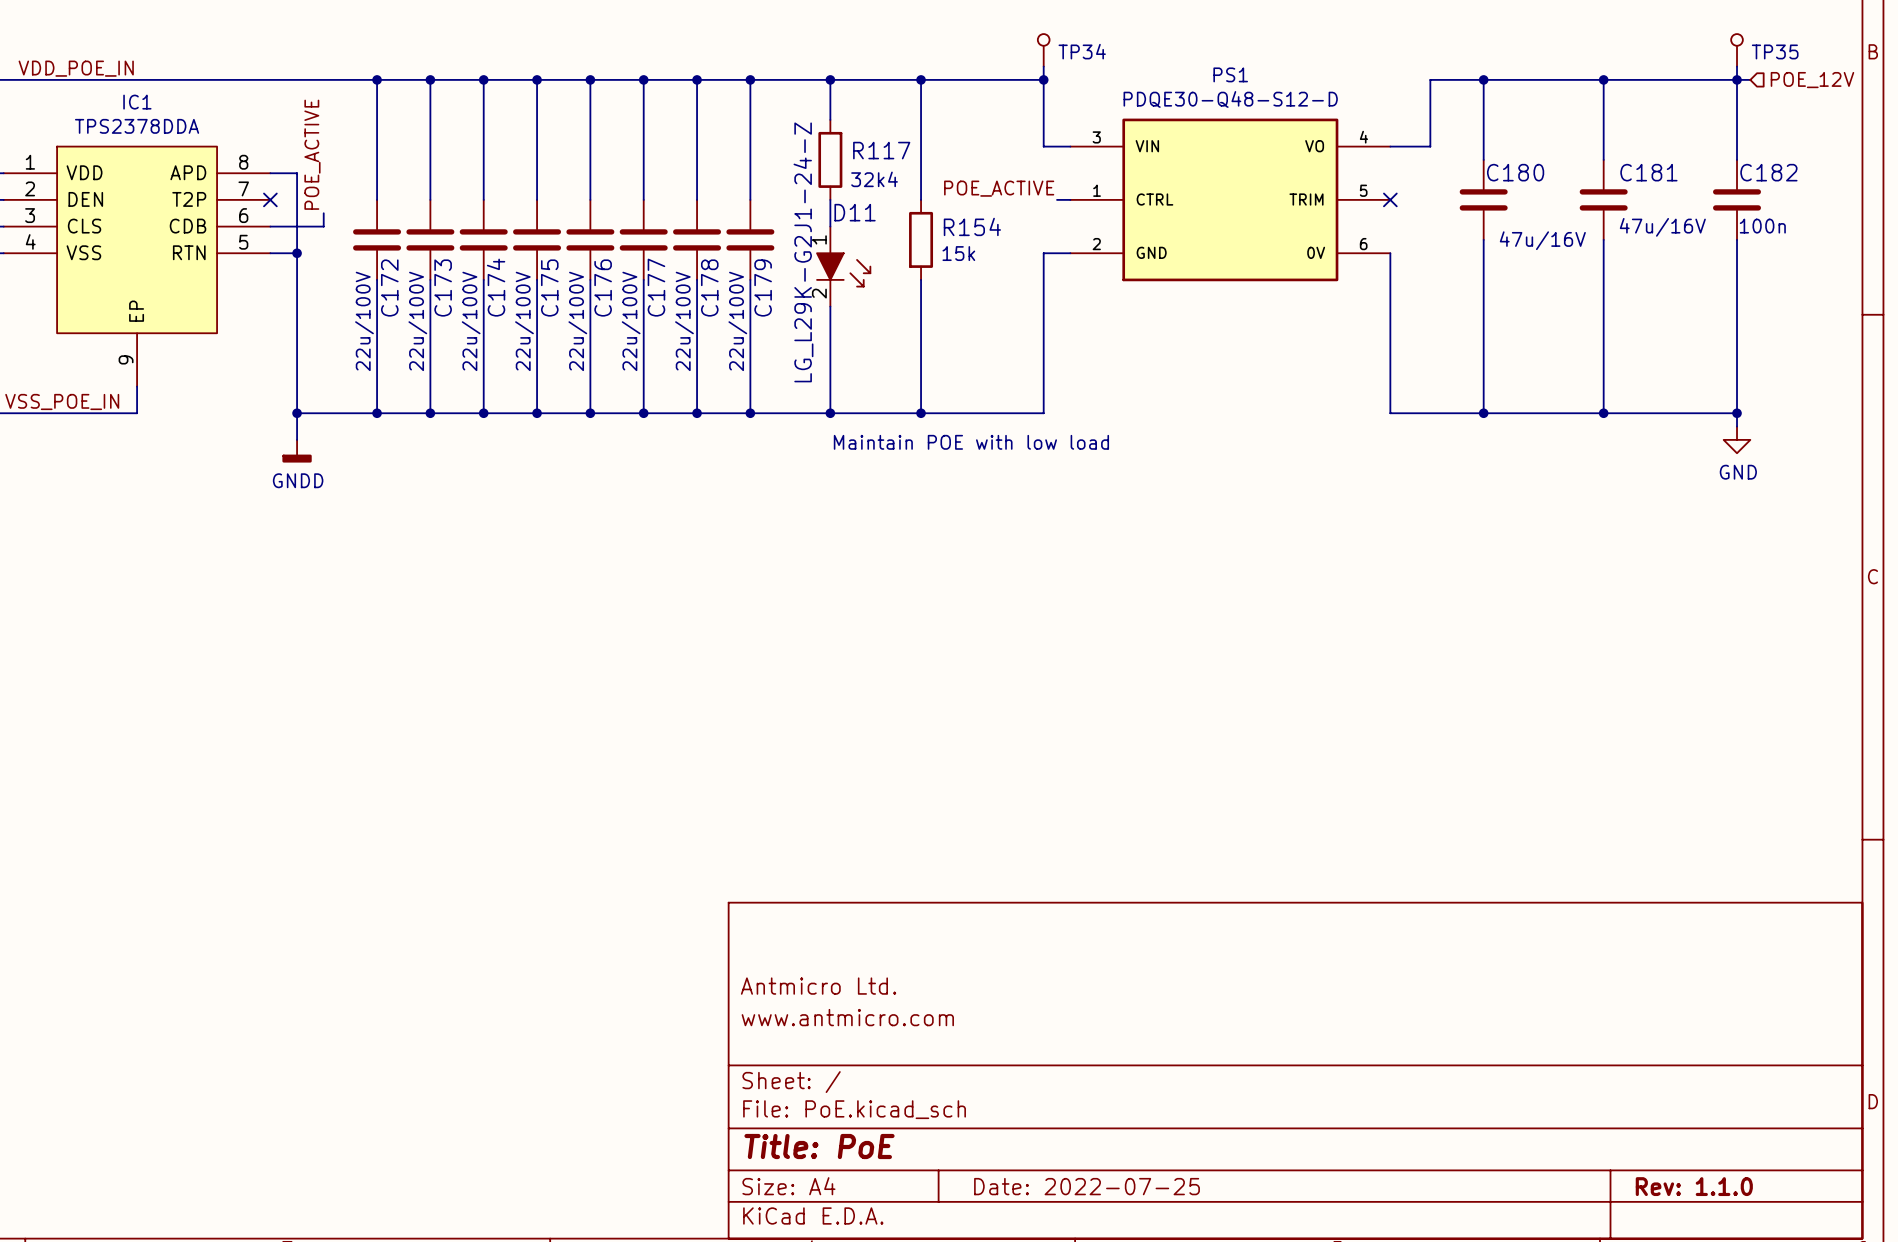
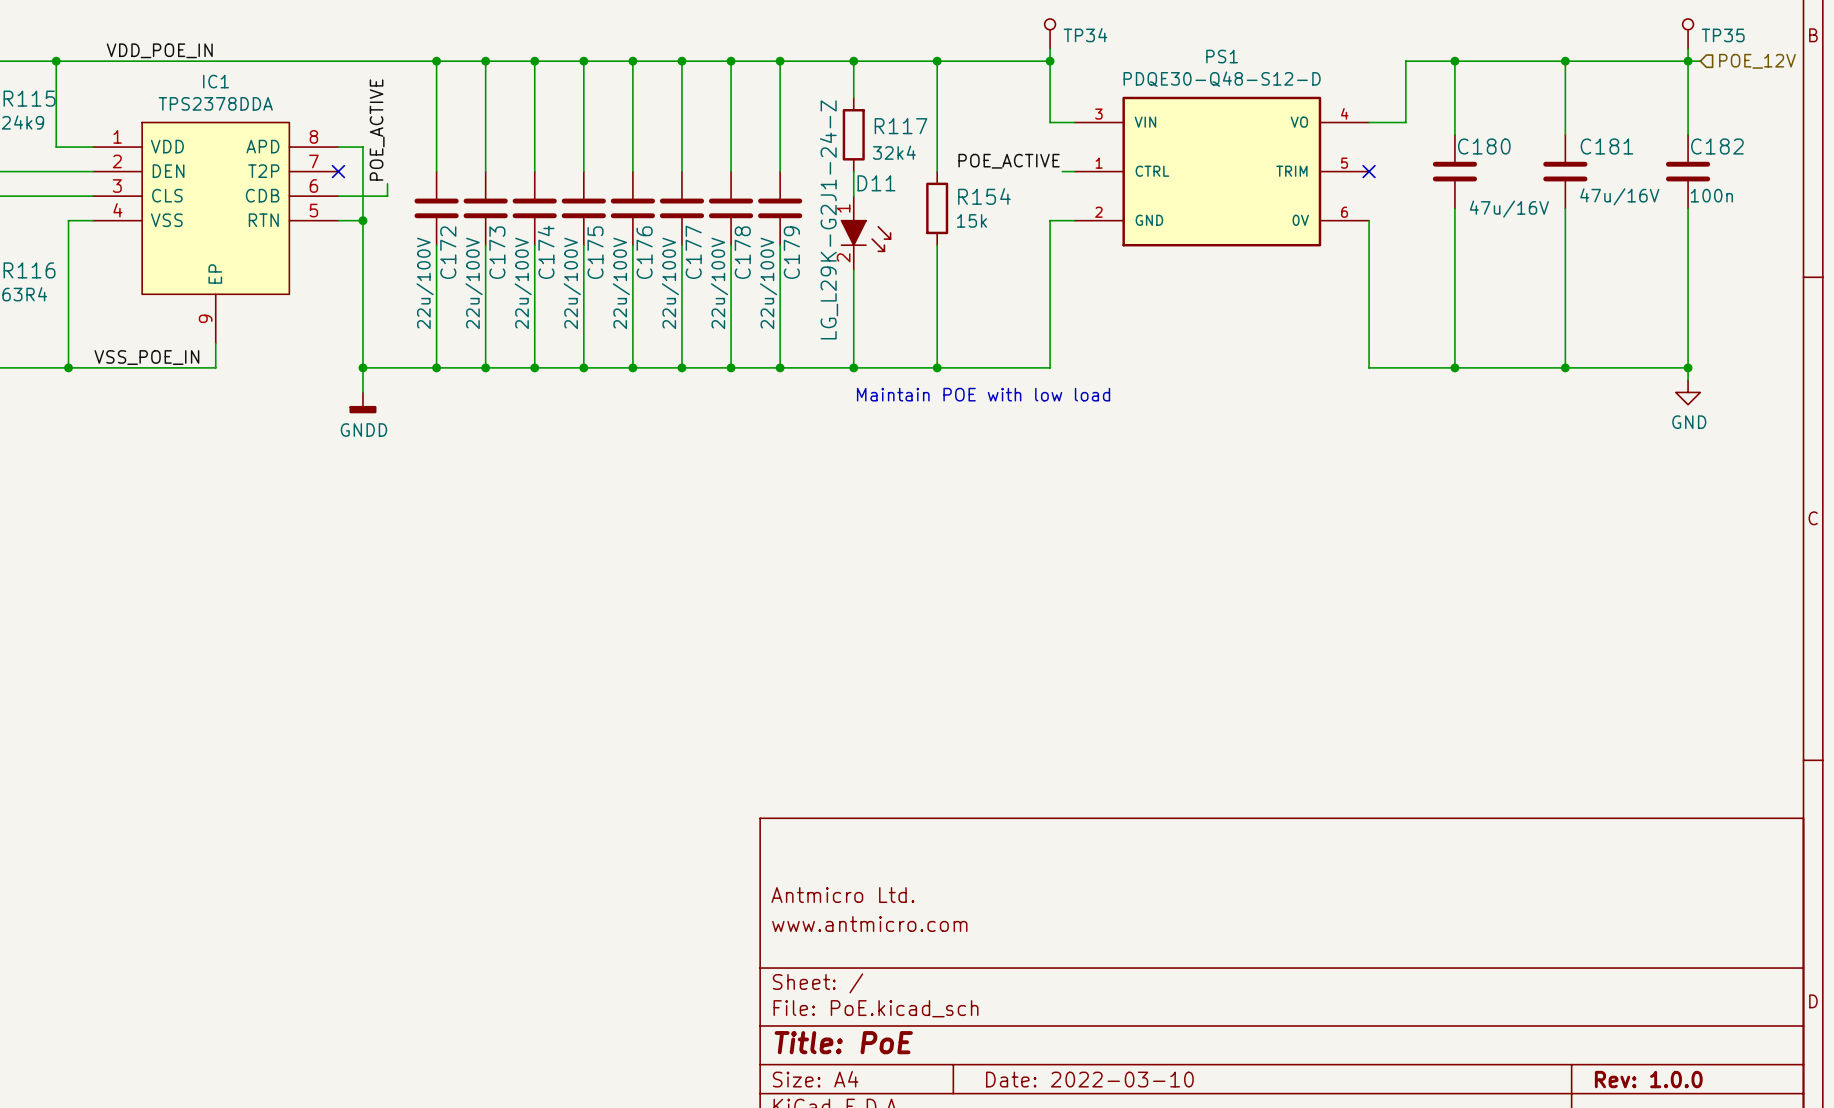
title block: Date: 2022-07-25 (1087, 1186) -> Date: 2022-03-10 (1089, 1079)
title block: Rev: 1.1.0 (1694, 1186) -> Rev: 1.0.0 (1648, 1079)

